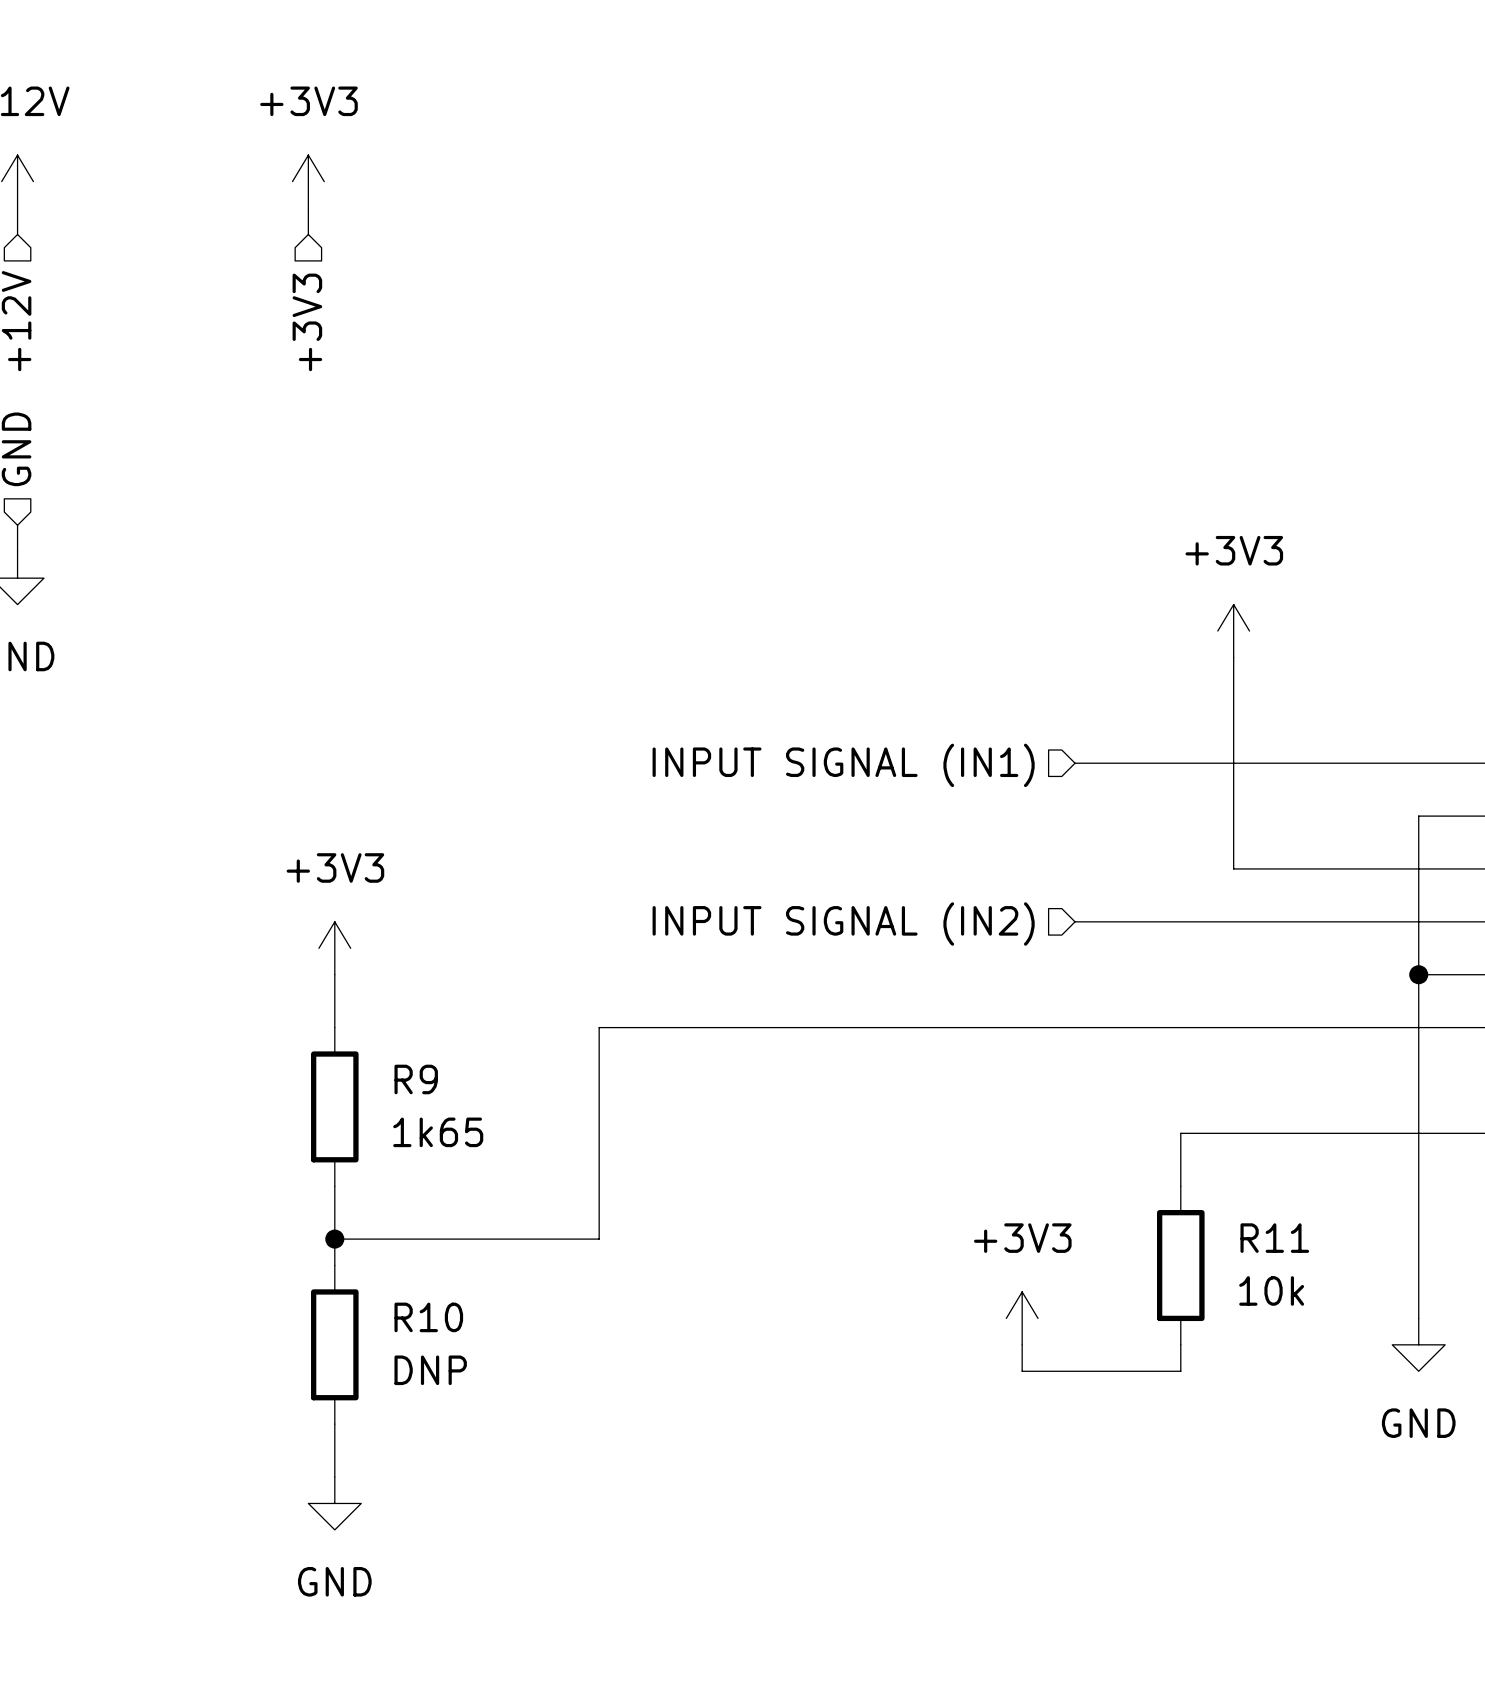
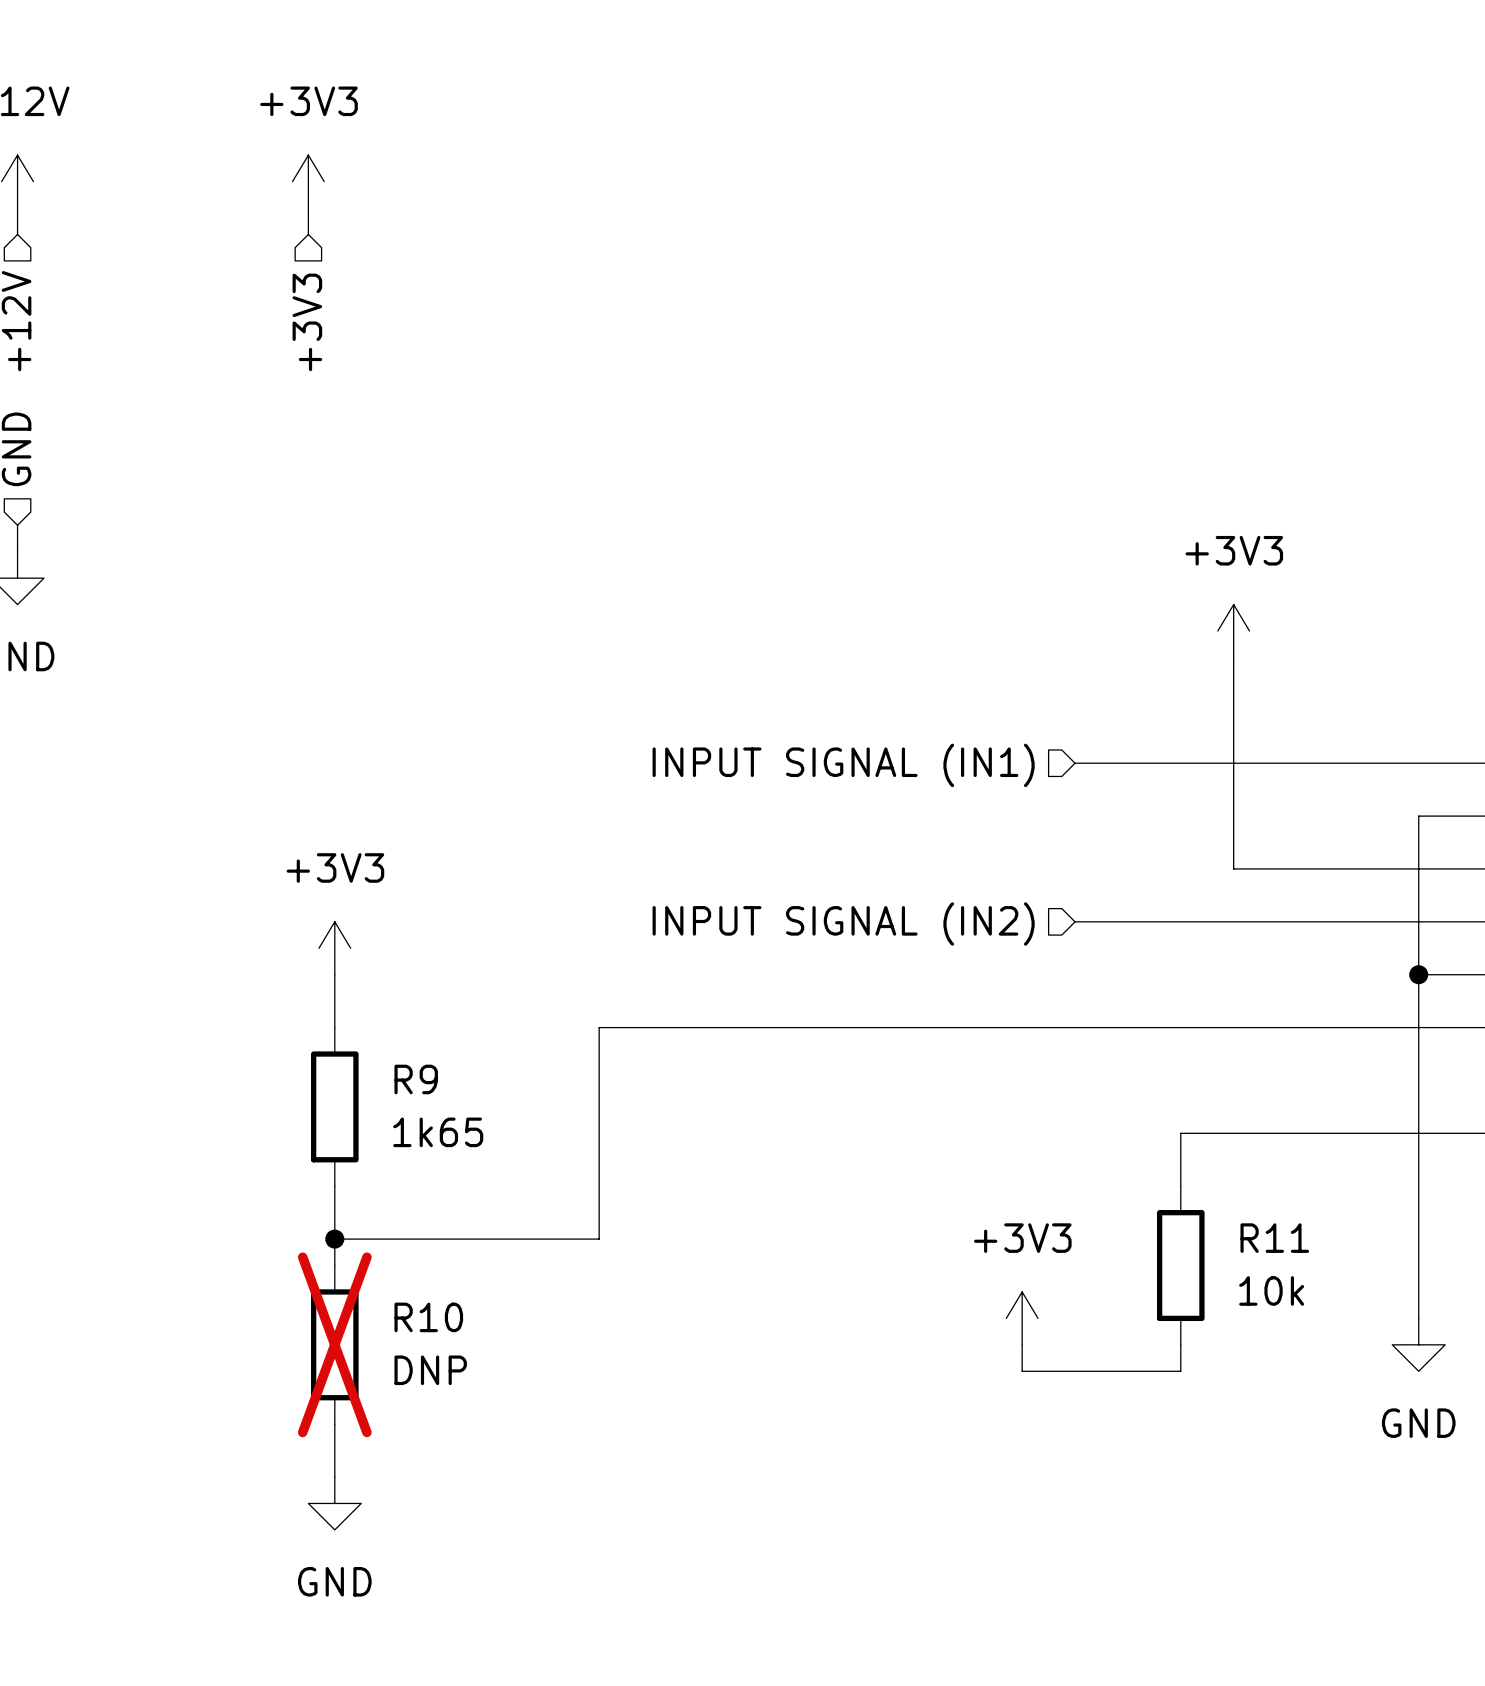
R10 do-not-place cross: none -> (334, 1344)

